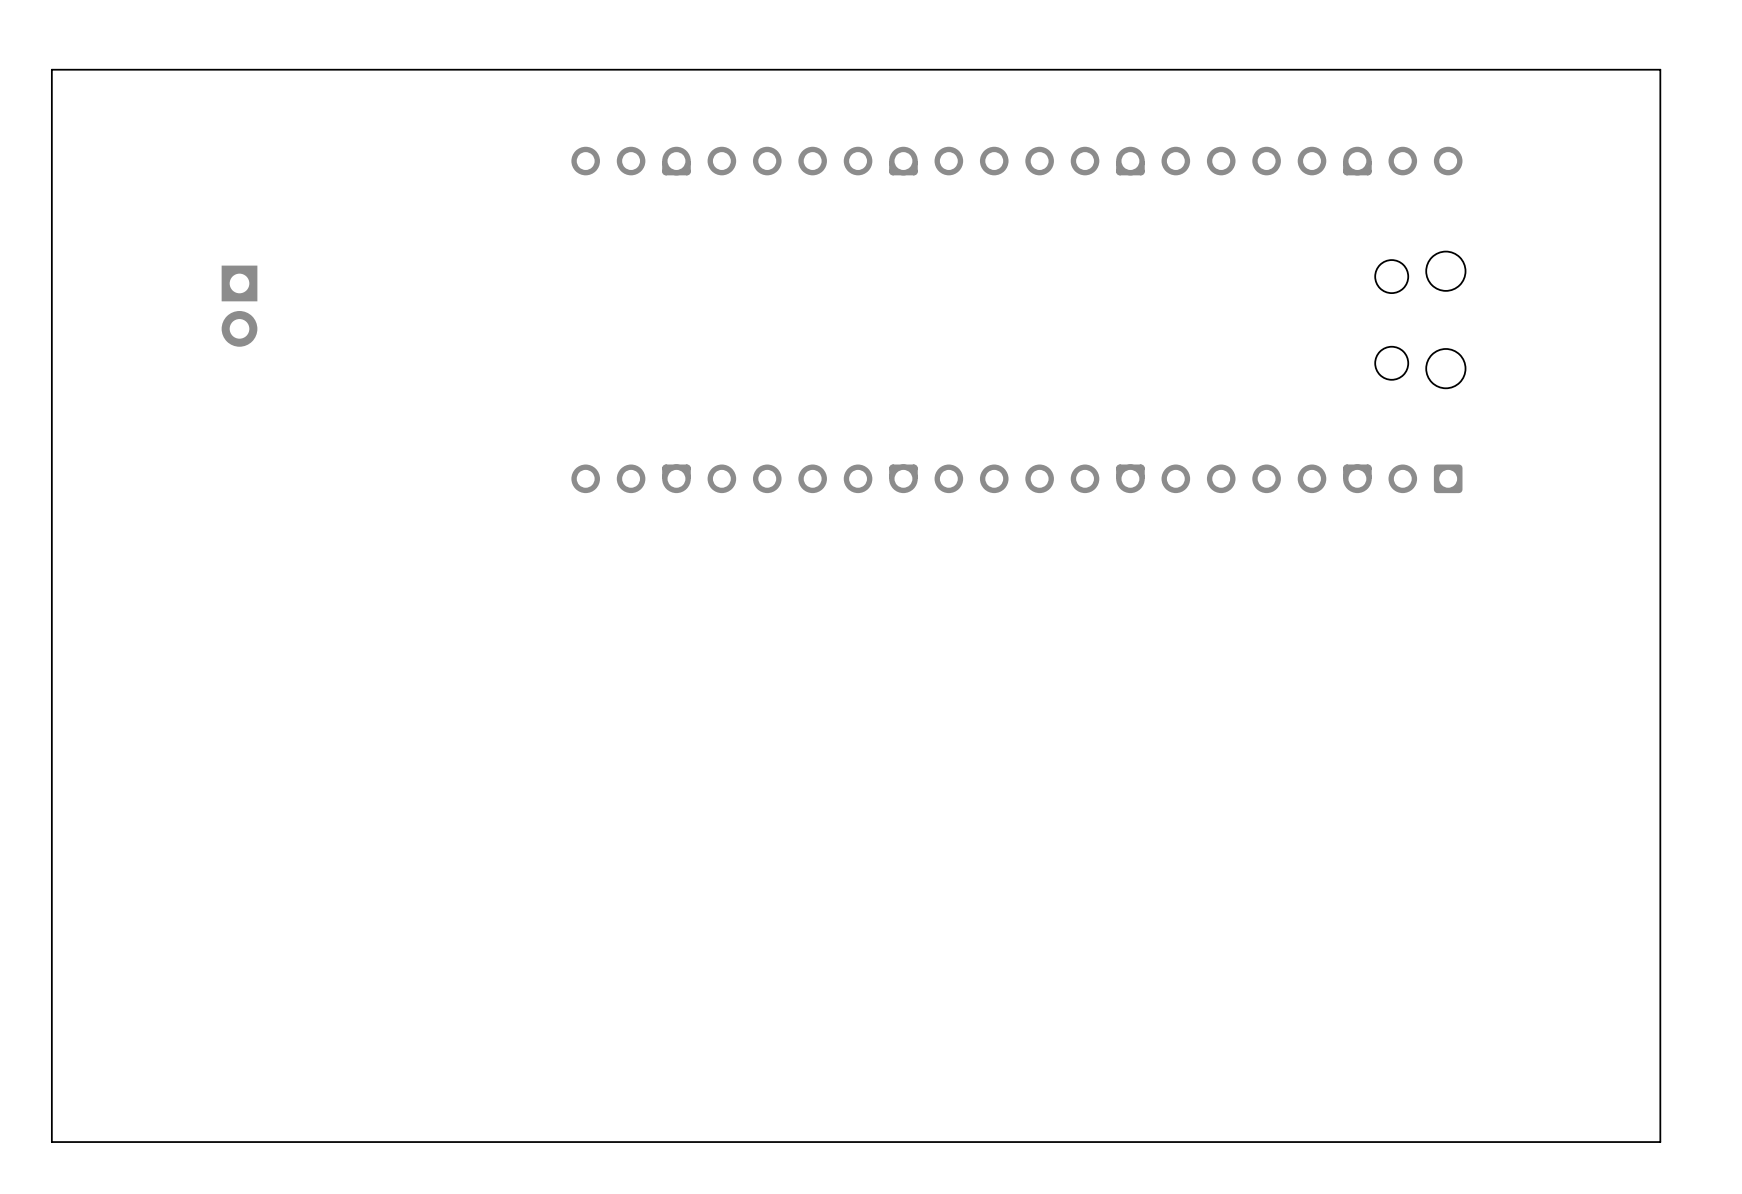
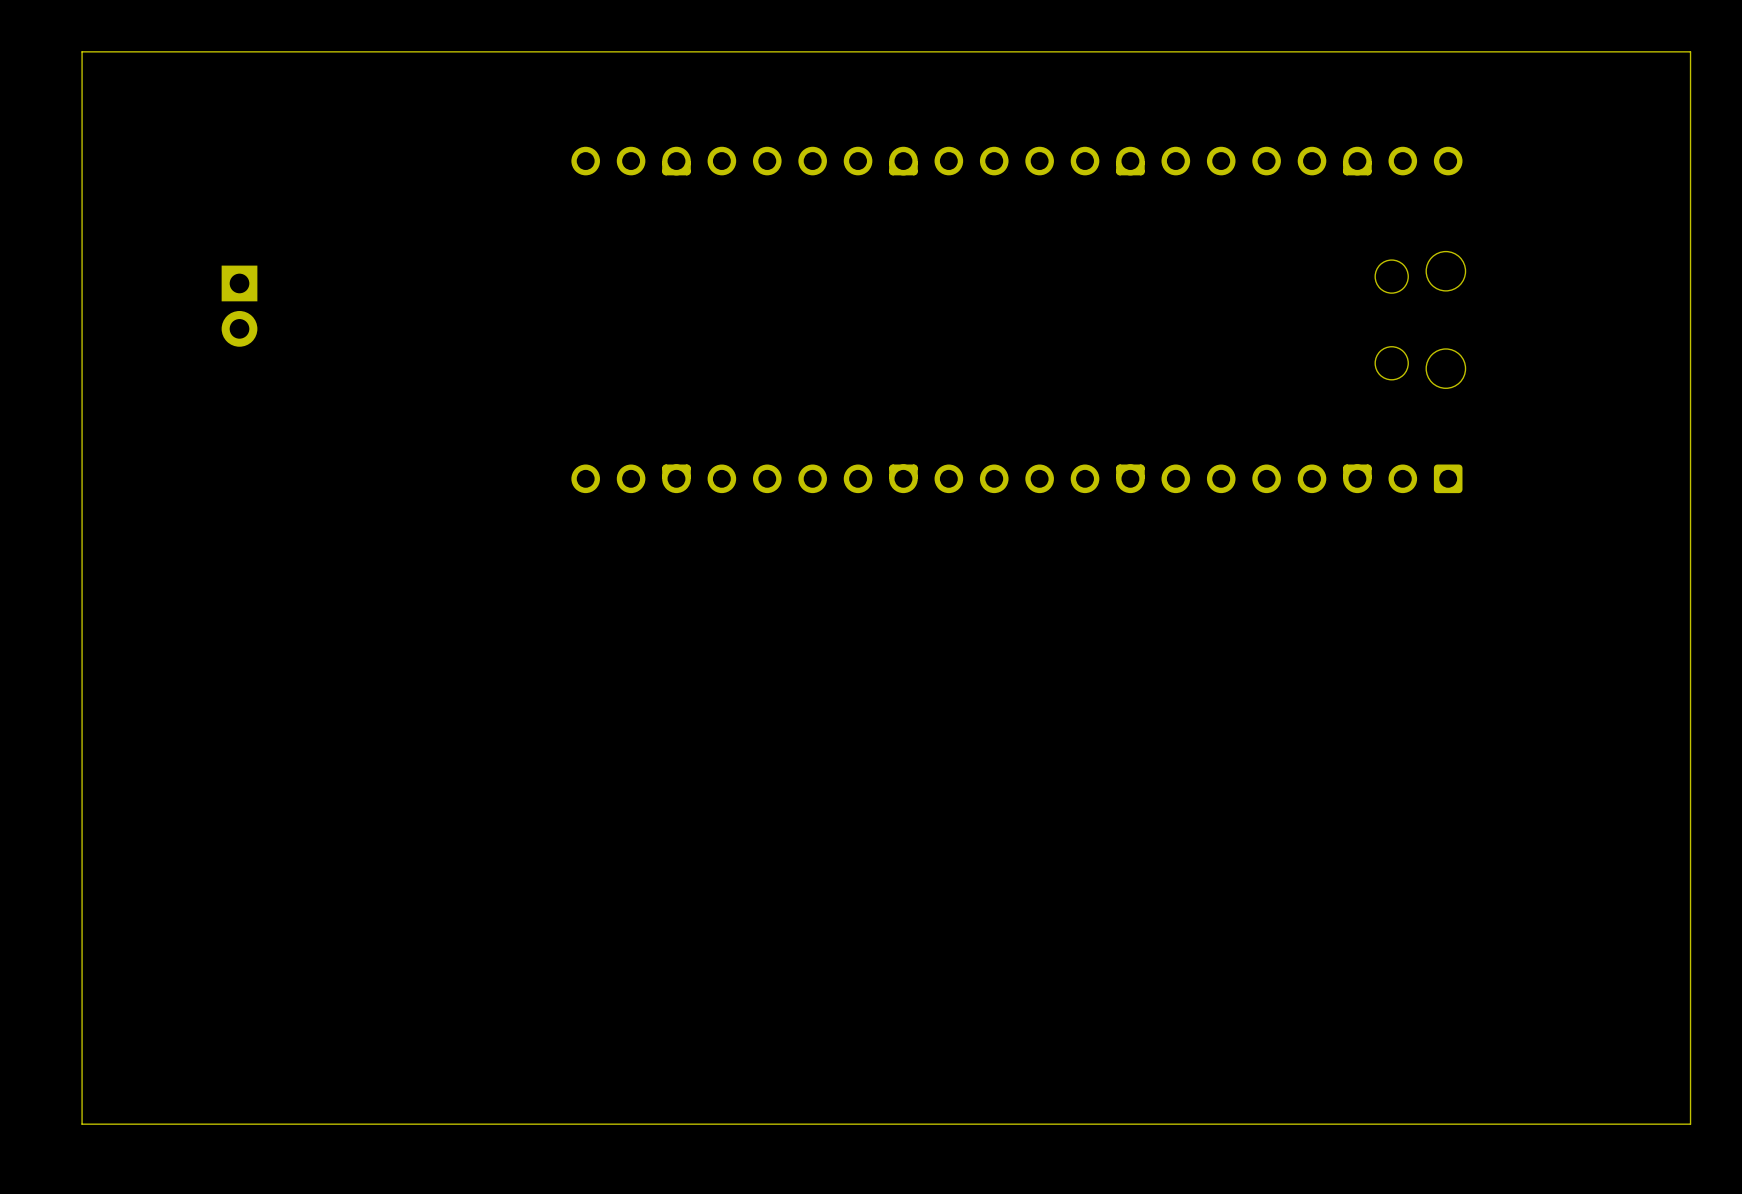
board edge: (1660, 69) (1660, 1142) (51, 1142) (51, 69) (1660, 69) -> (1690, 51) (1690, 1124) (82, 1124) (82, 51) (1690, 51)

